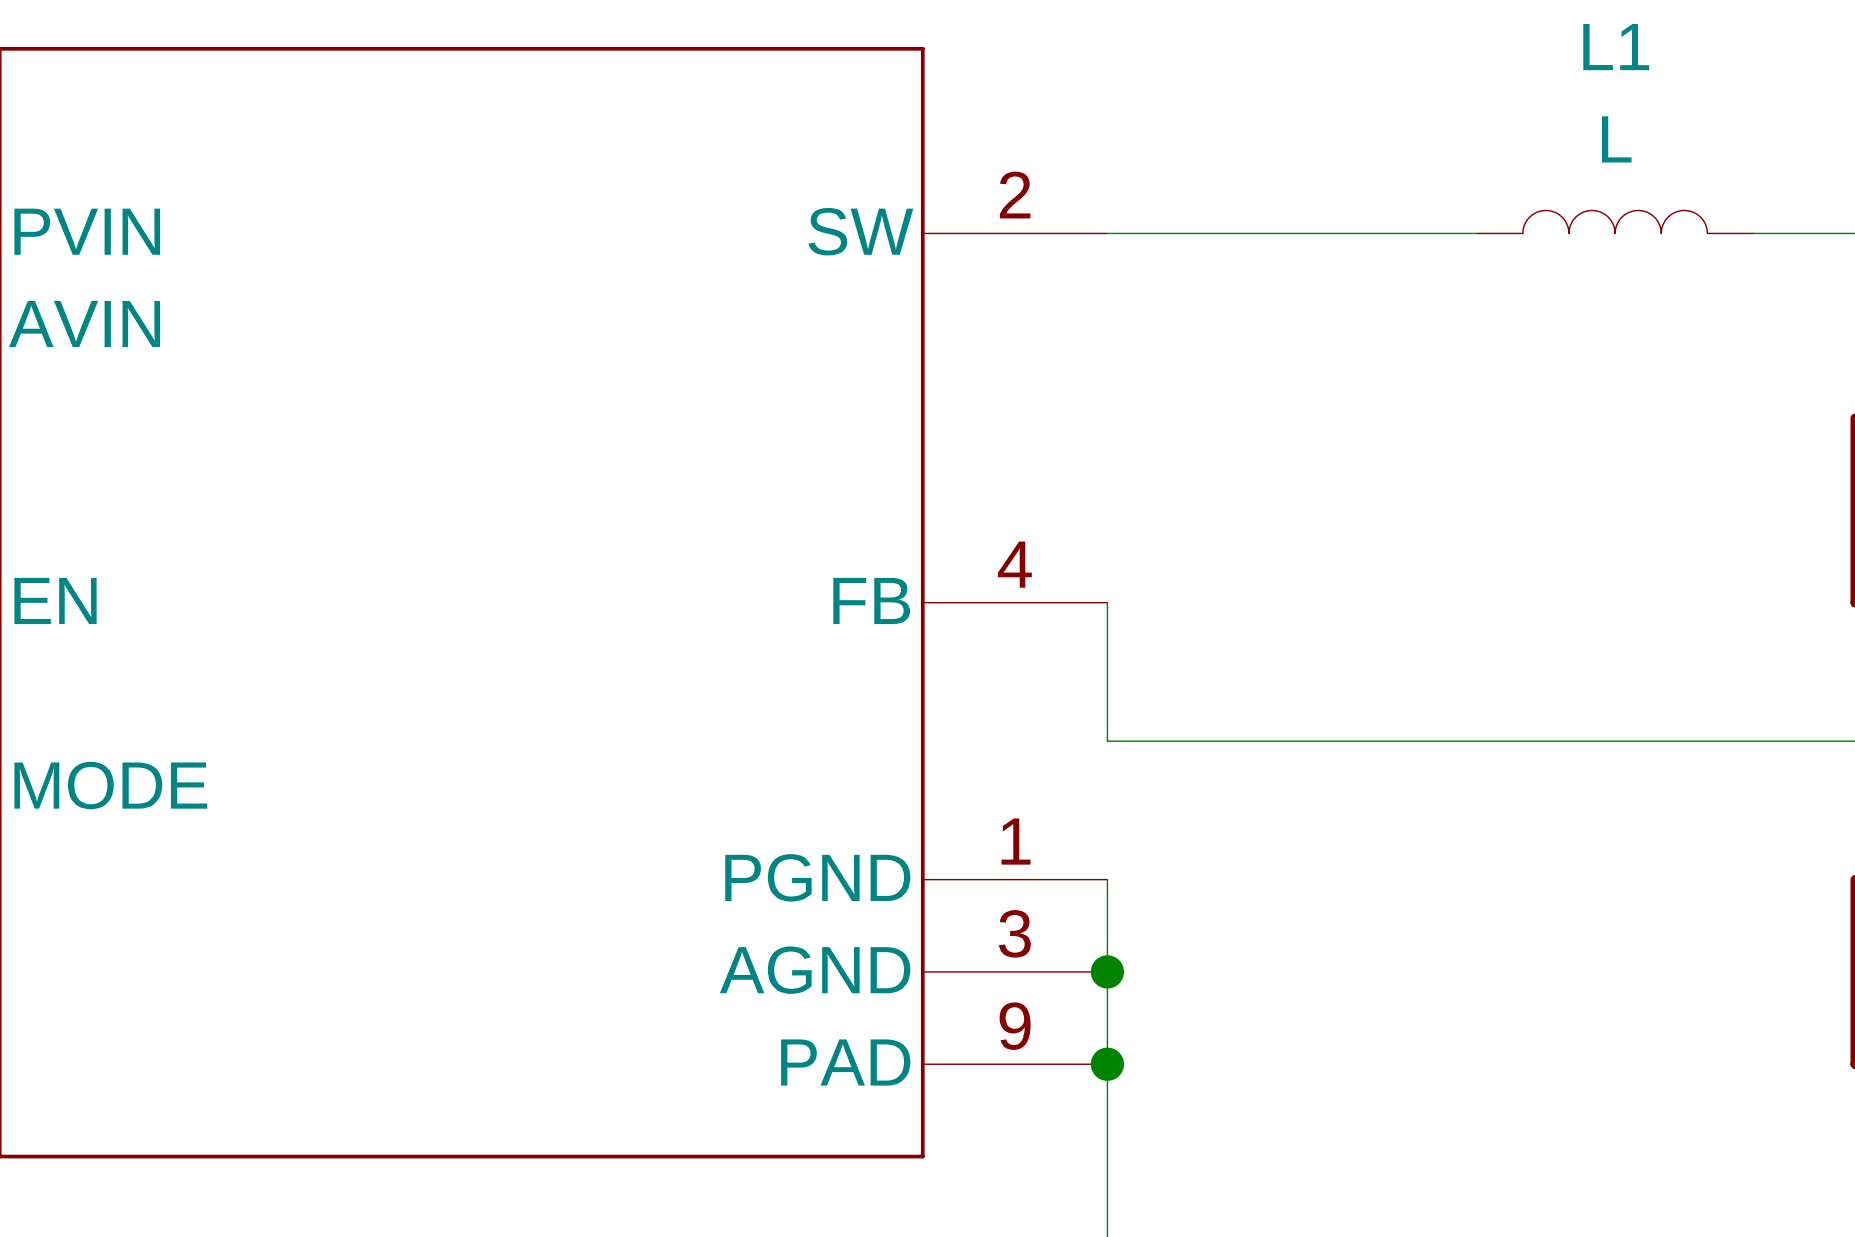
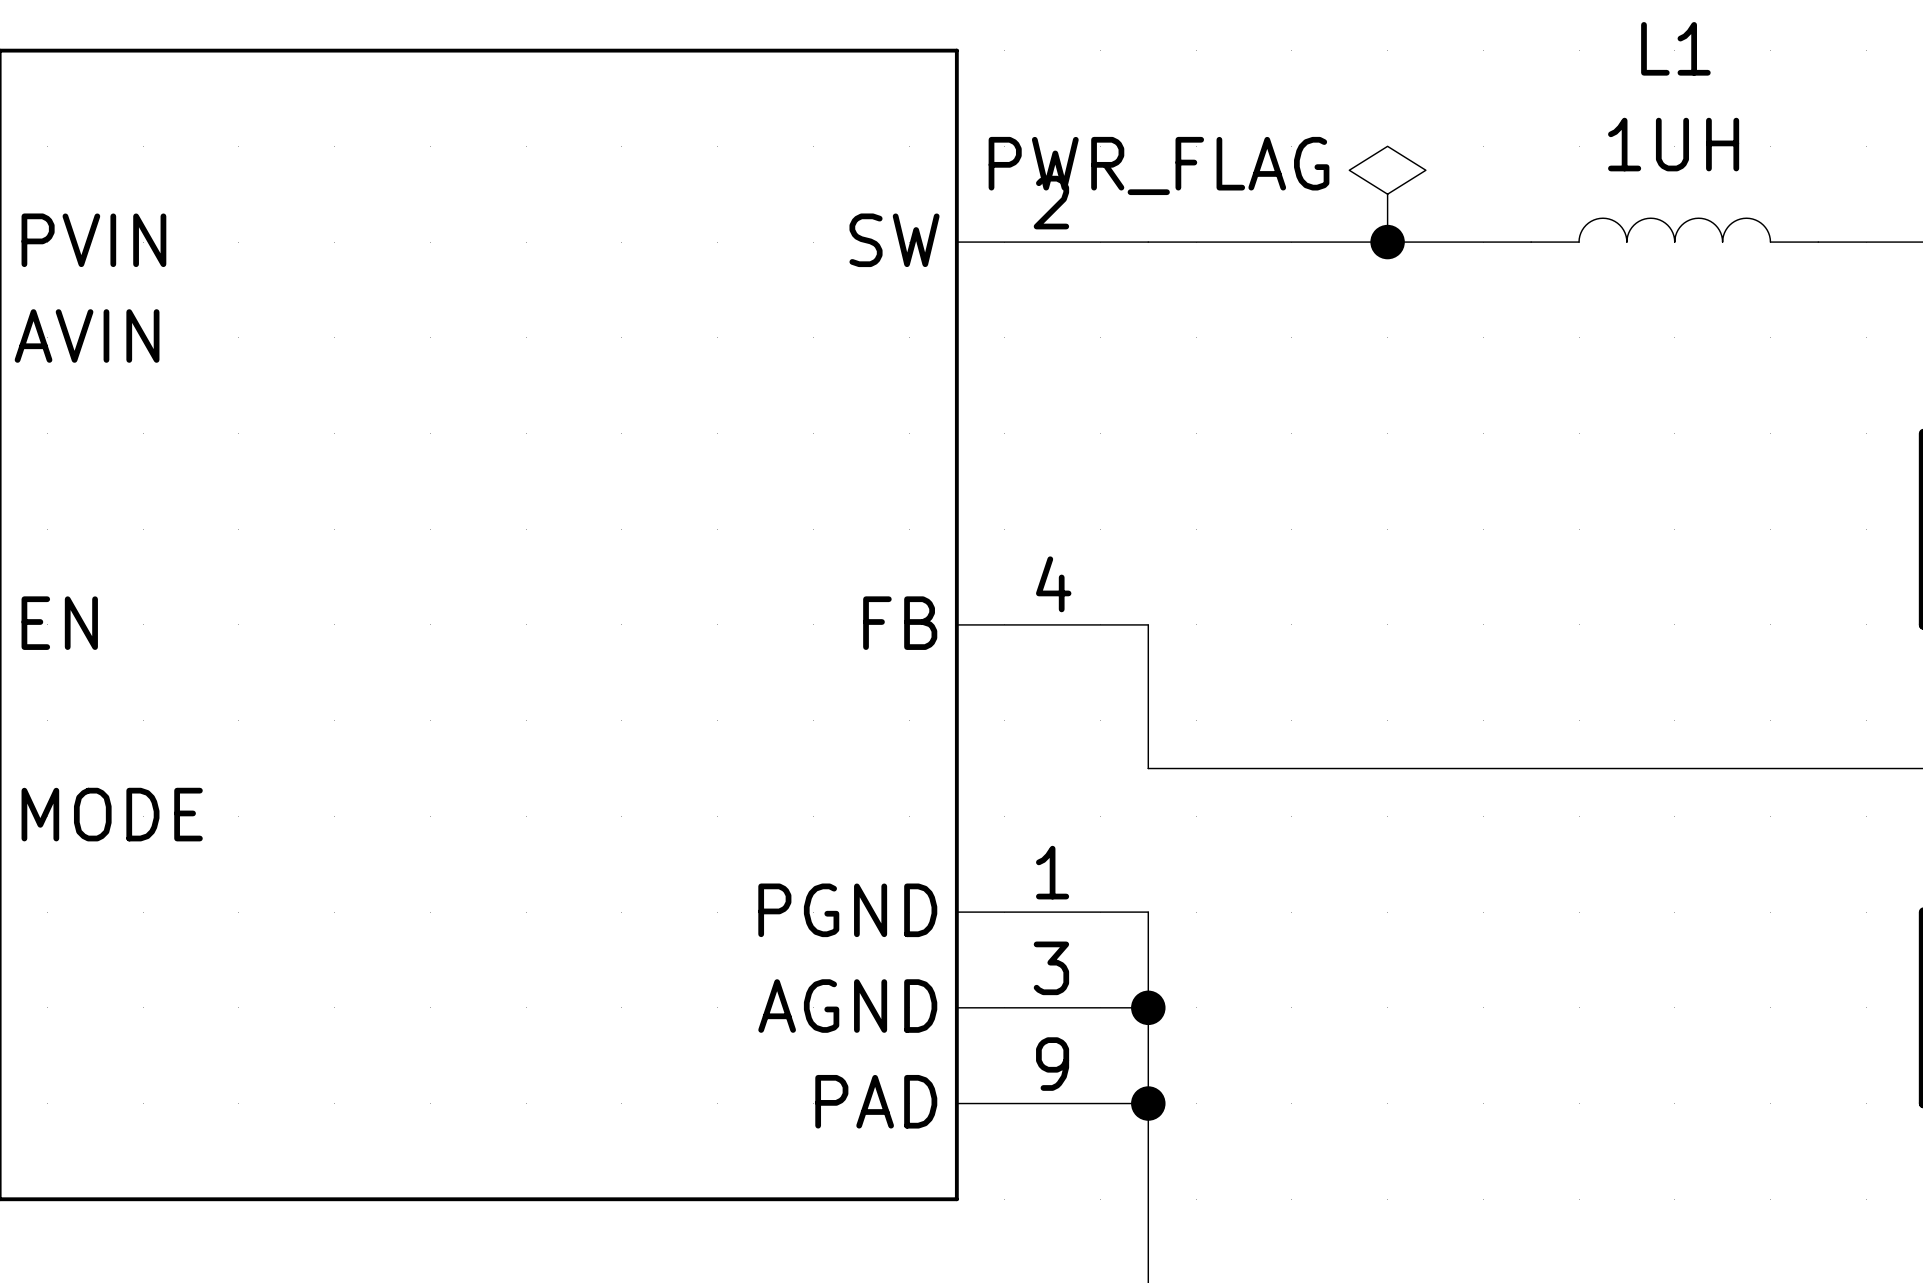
L1 value: L (1616, 139) -> 1UH (1673, 144)
power symbol: none -> PWR_FLAG (1387, 194)
junction: none -> (1387, 242)

